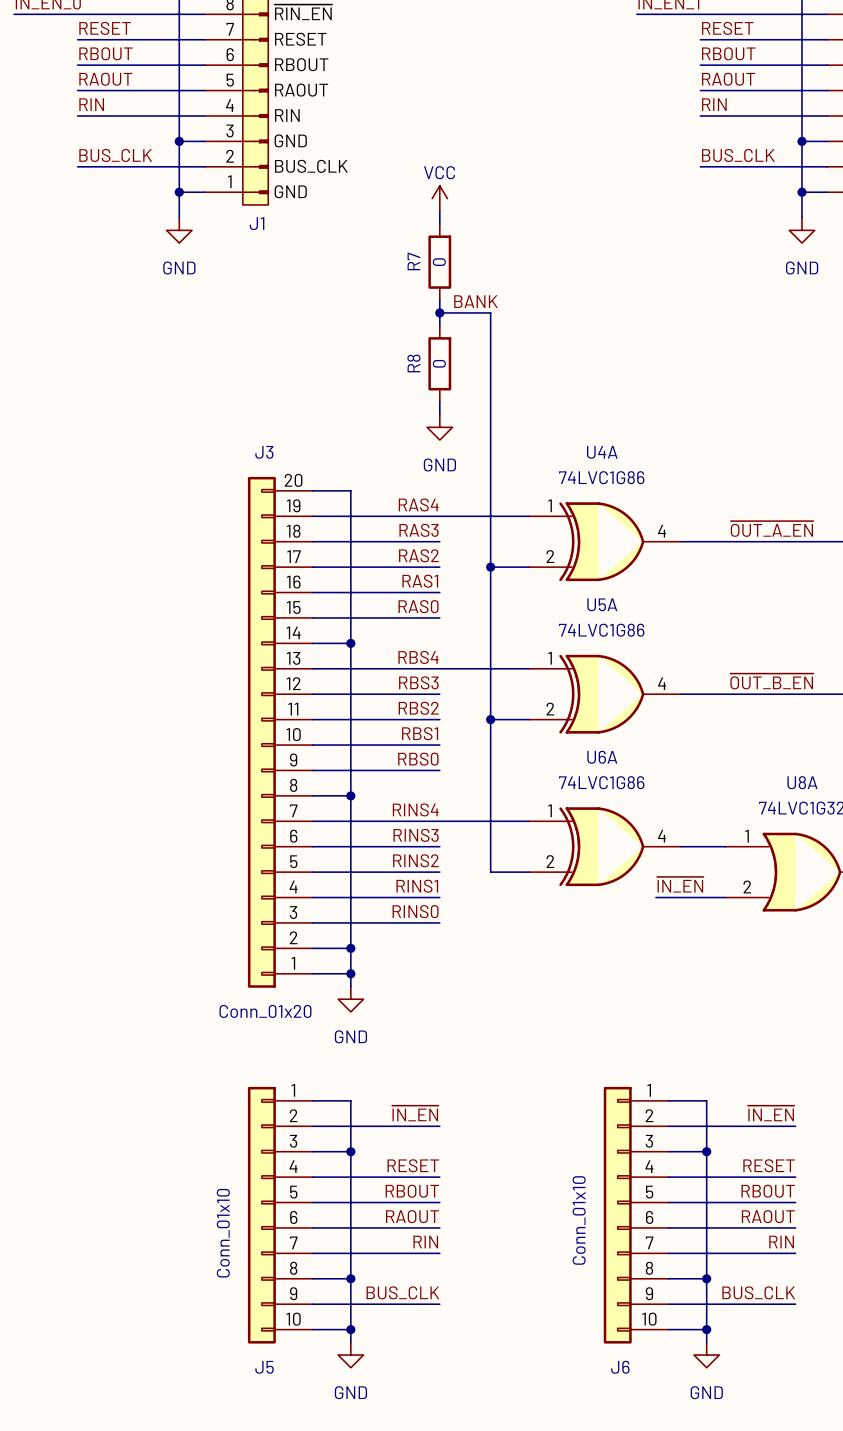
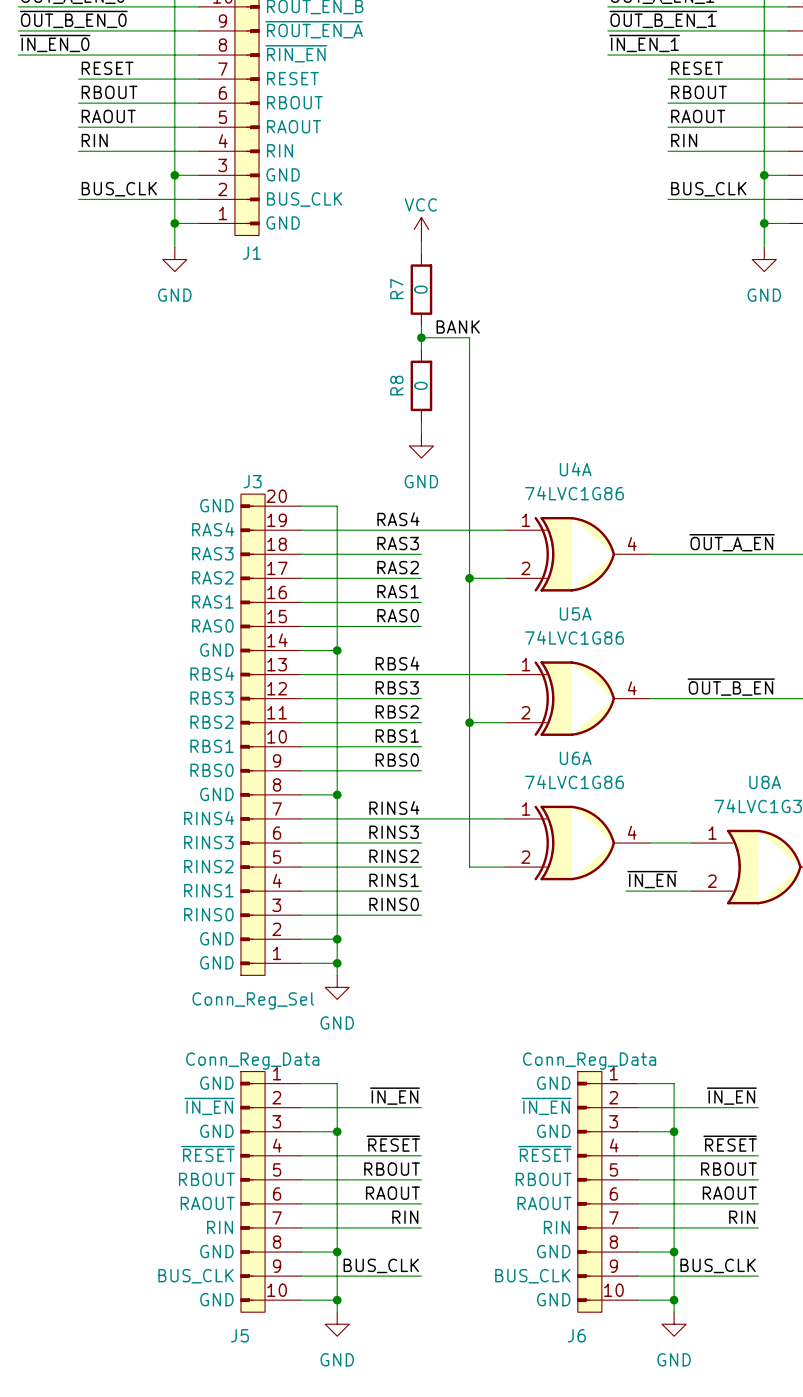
J3 symbol: [247, 476, 313, 988] -> [240, 494, 302, 976]
J3 value: Conn_01x20 (265, 1011) -> Conn_Reg_Sel (253, 1000)
J5 symbol: [247, 1086, 313, 1344] -> [240, 1071, 302, 1313]
J6 symbol: [603, 1086, 669, 1344] -> [577, 1071, 638, 1313]
label: RESET (413, 1165) -> ~{RESET} (393, 1143)
label: RESET (769, 1165) -> ~{RESET} (730, 1143)
J6 value: Conn_01x10 (579, 1220) -> Conn_Reg_Data (589, 1061)
J5 value: Conn_01x10 (223, 1233) -> Conn_Reg_Data (252, 1061)

